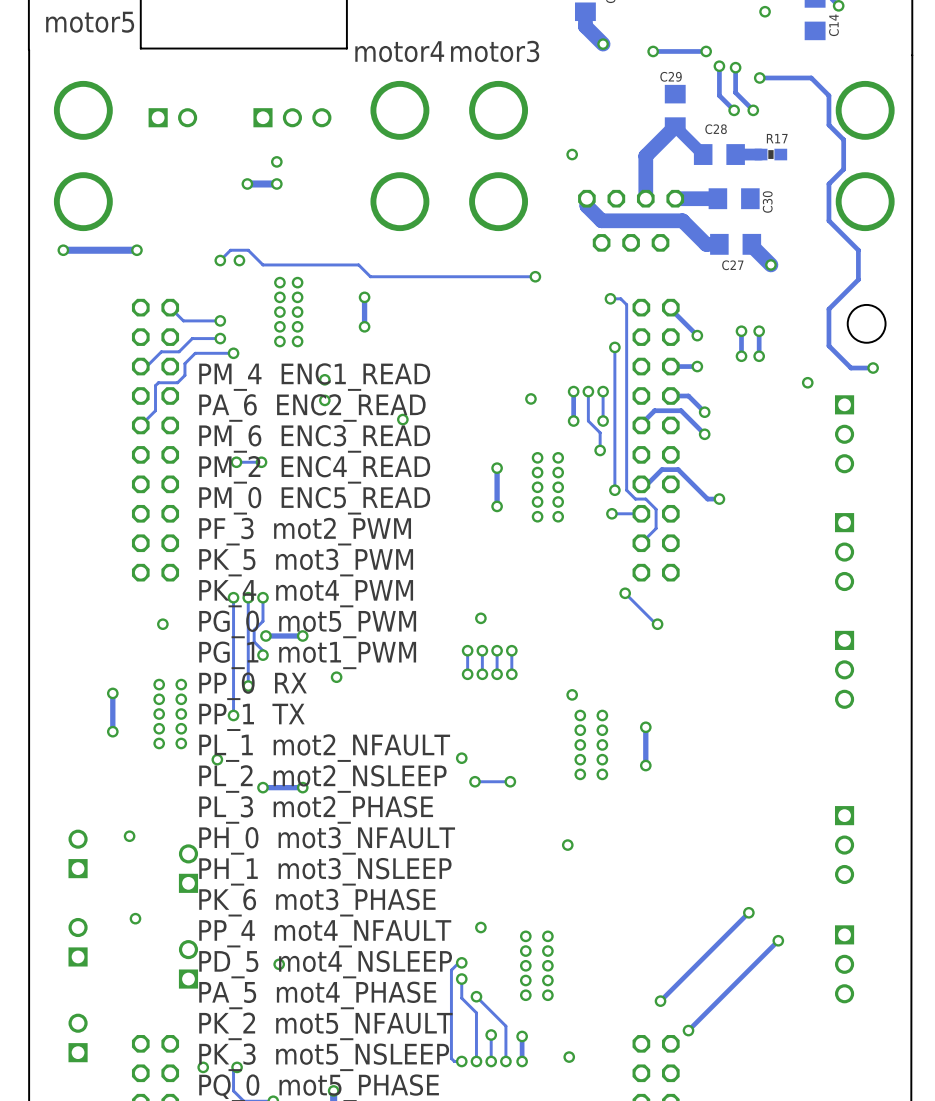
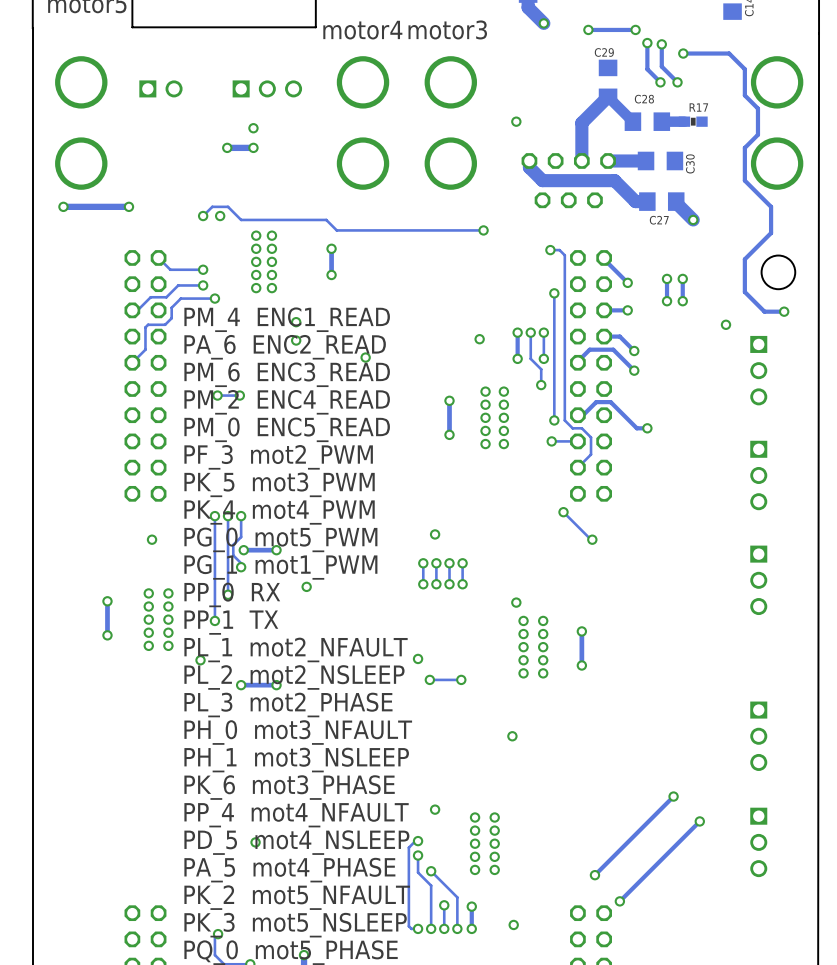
via: (129, 836) -> none
part: (78, 853) -> none
part: (188, 868) -> none
via: (135, 918) -> none
part: (78, 942) -> none
part: (188, 964) -> none
part: (78, 1037) -> none
via: (203, 1067) -> none

